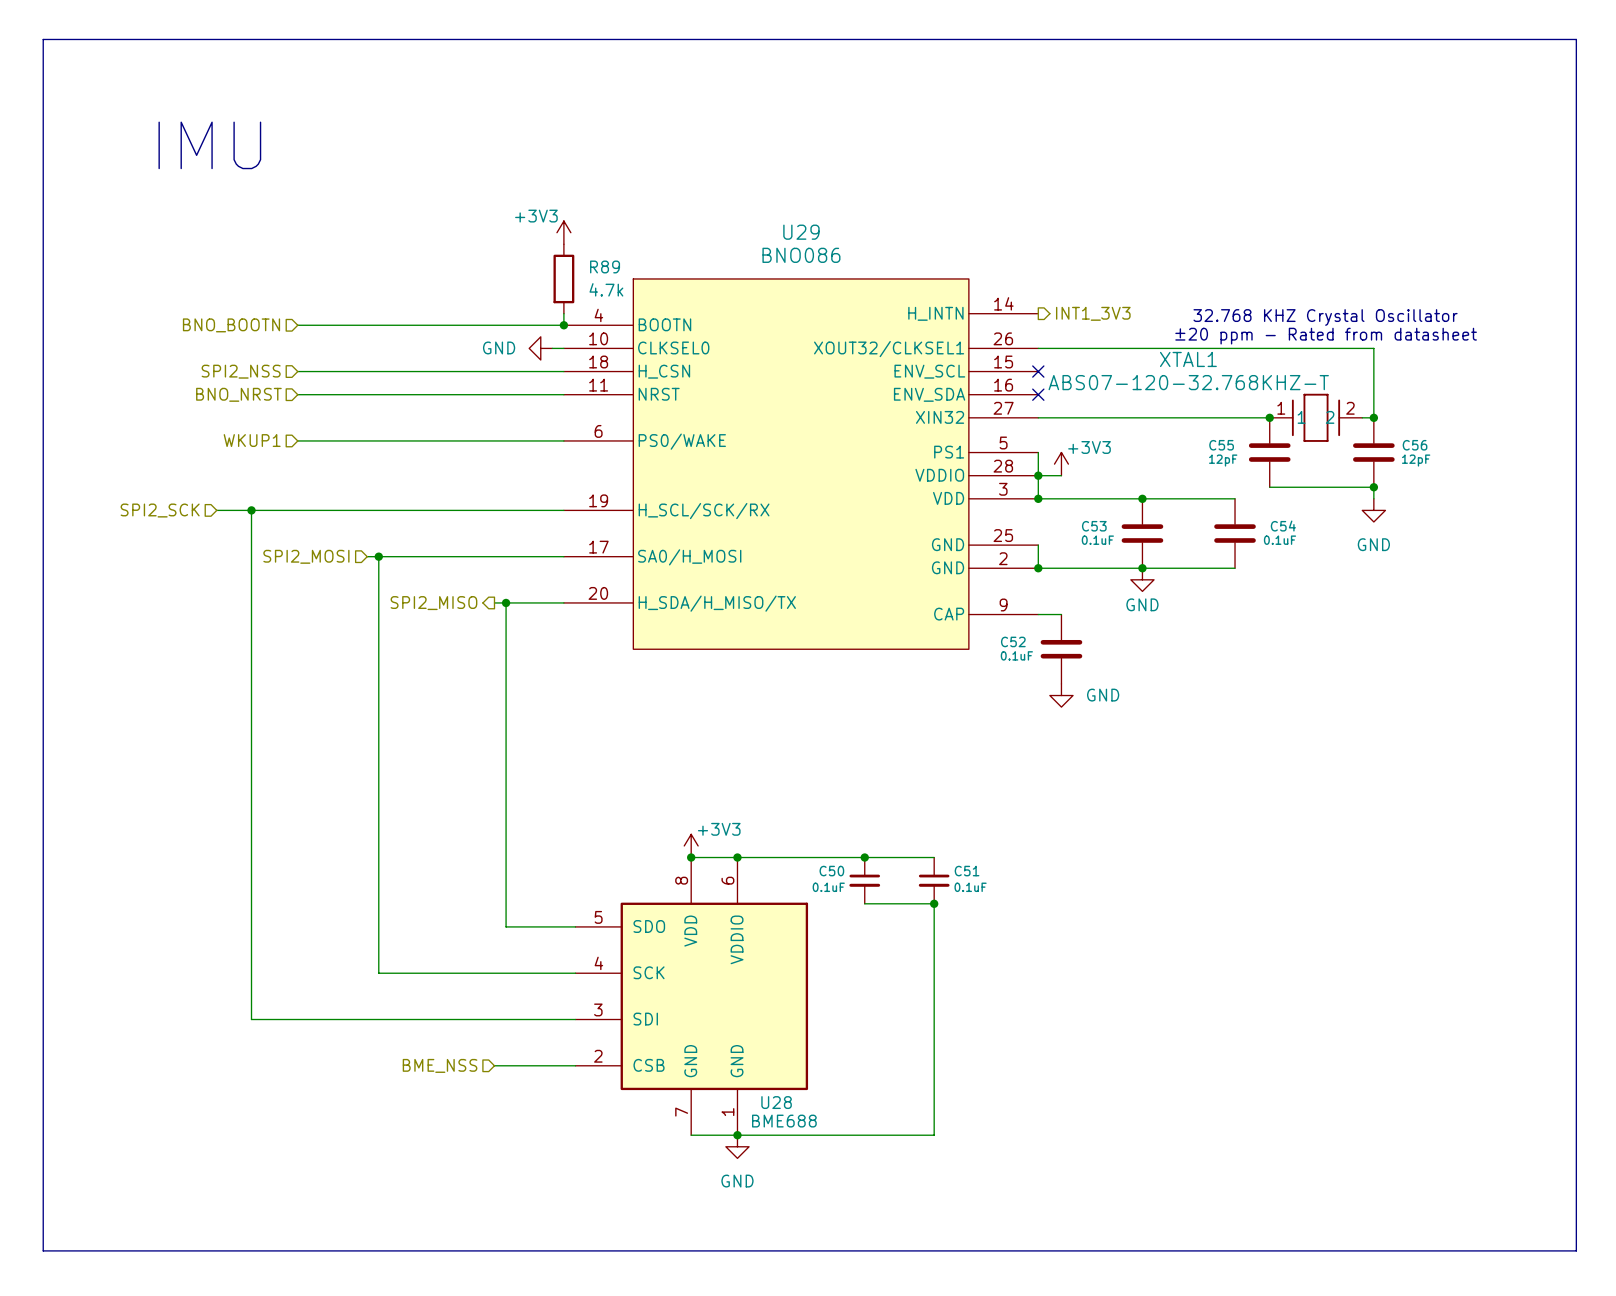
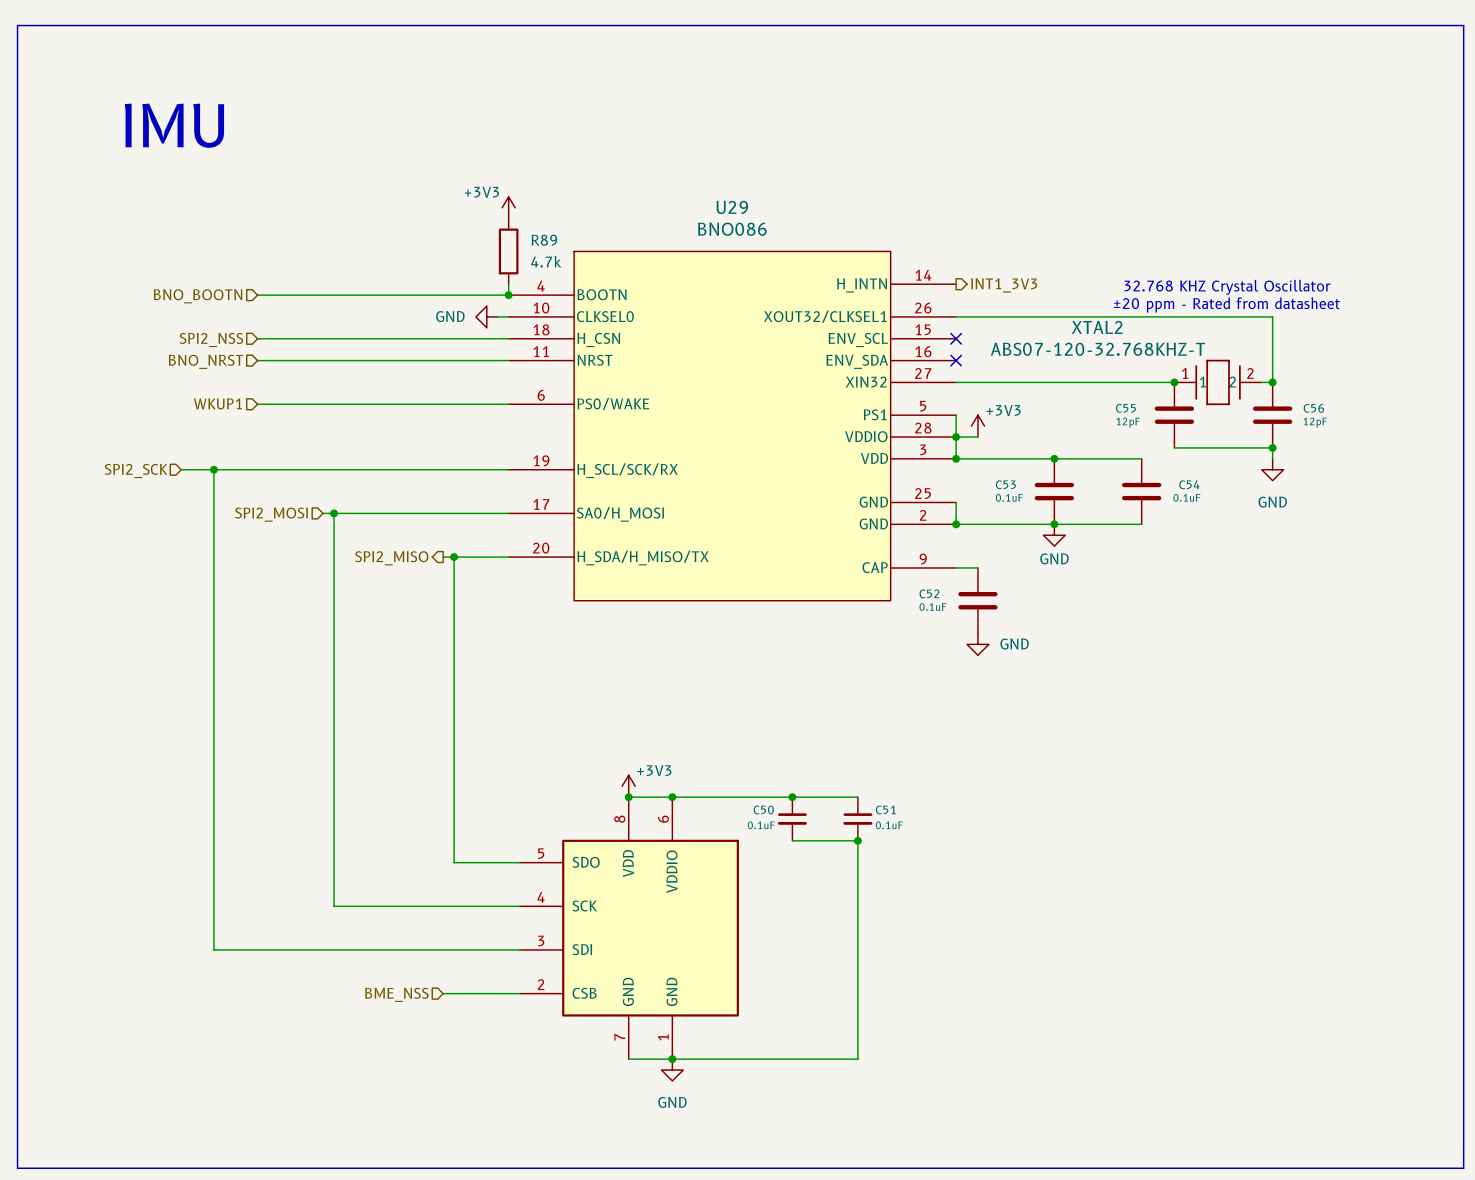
XTAL1 name: XTAL1 (1188, 359) -> XTAL2 (1097, 327)
U28 name: U28 (776, 1102) -> none
U28 value: BME688 (784, 1121) -> none

